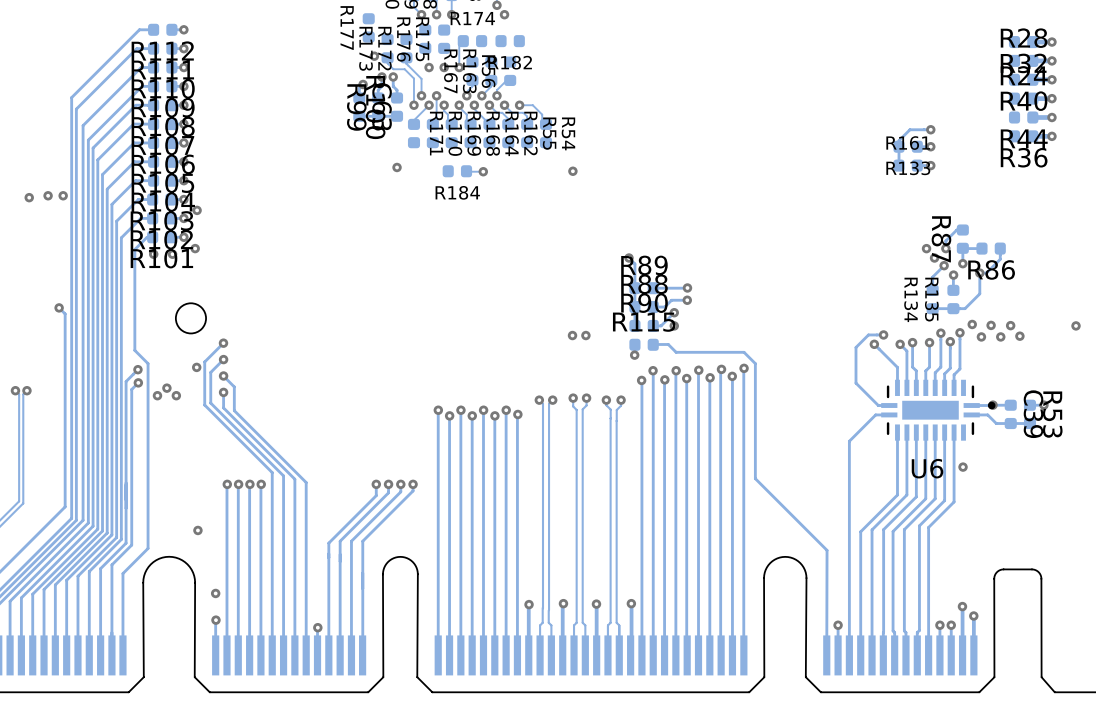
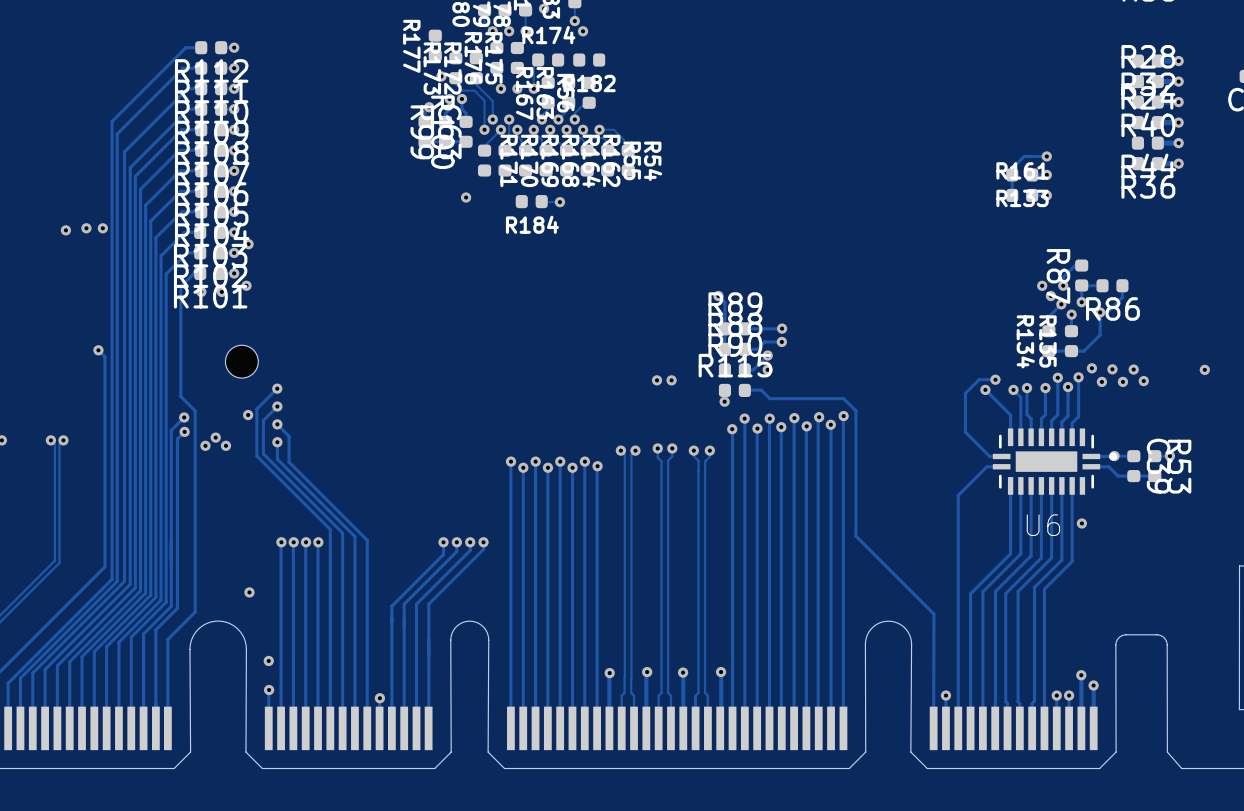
via: (572, 171) -> none

